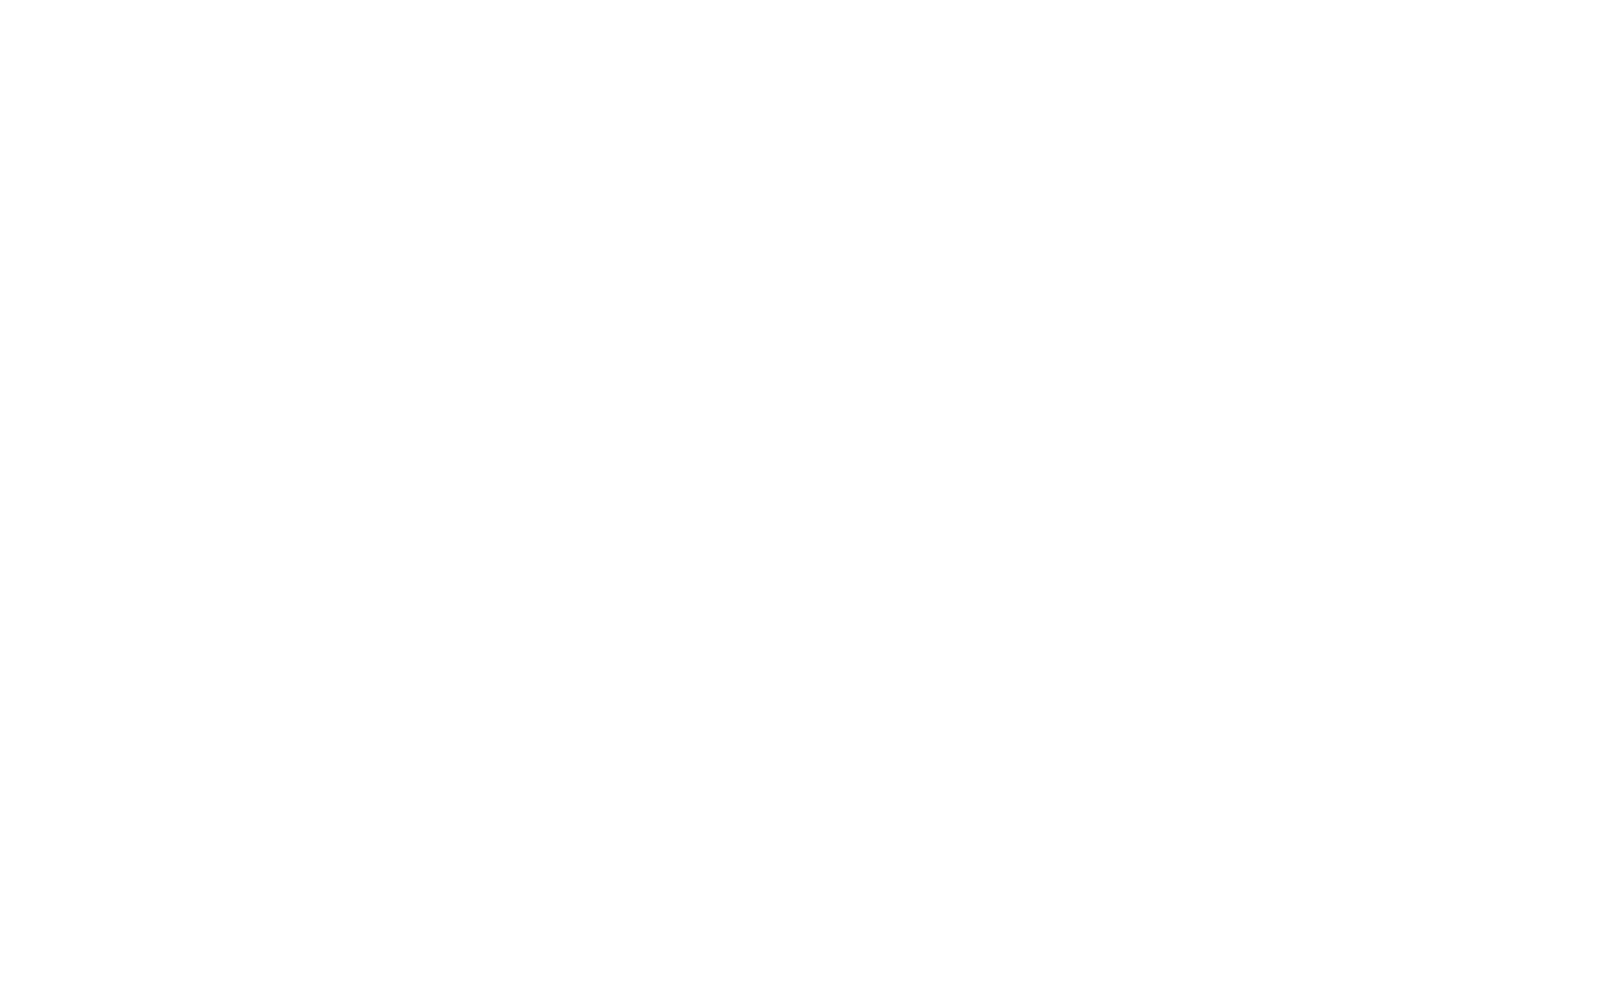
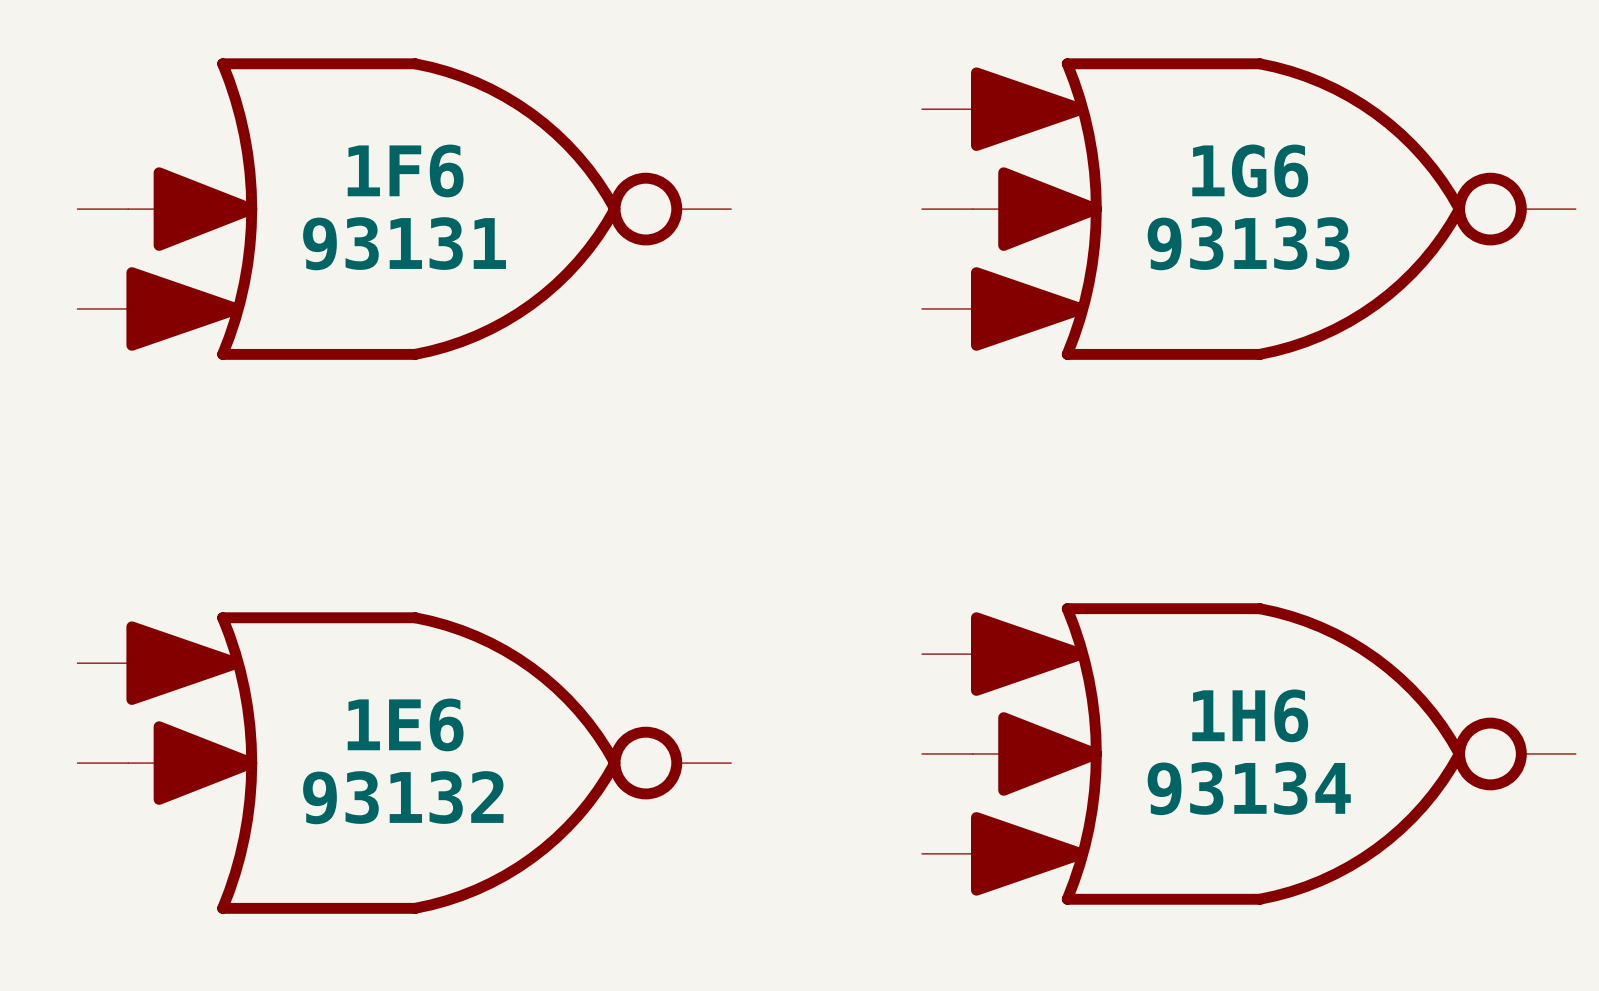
part: none -> (404, 209)
part: none -> (1248, 209)
part: none -> (1248, 753)
part: none -> (404, 763)

